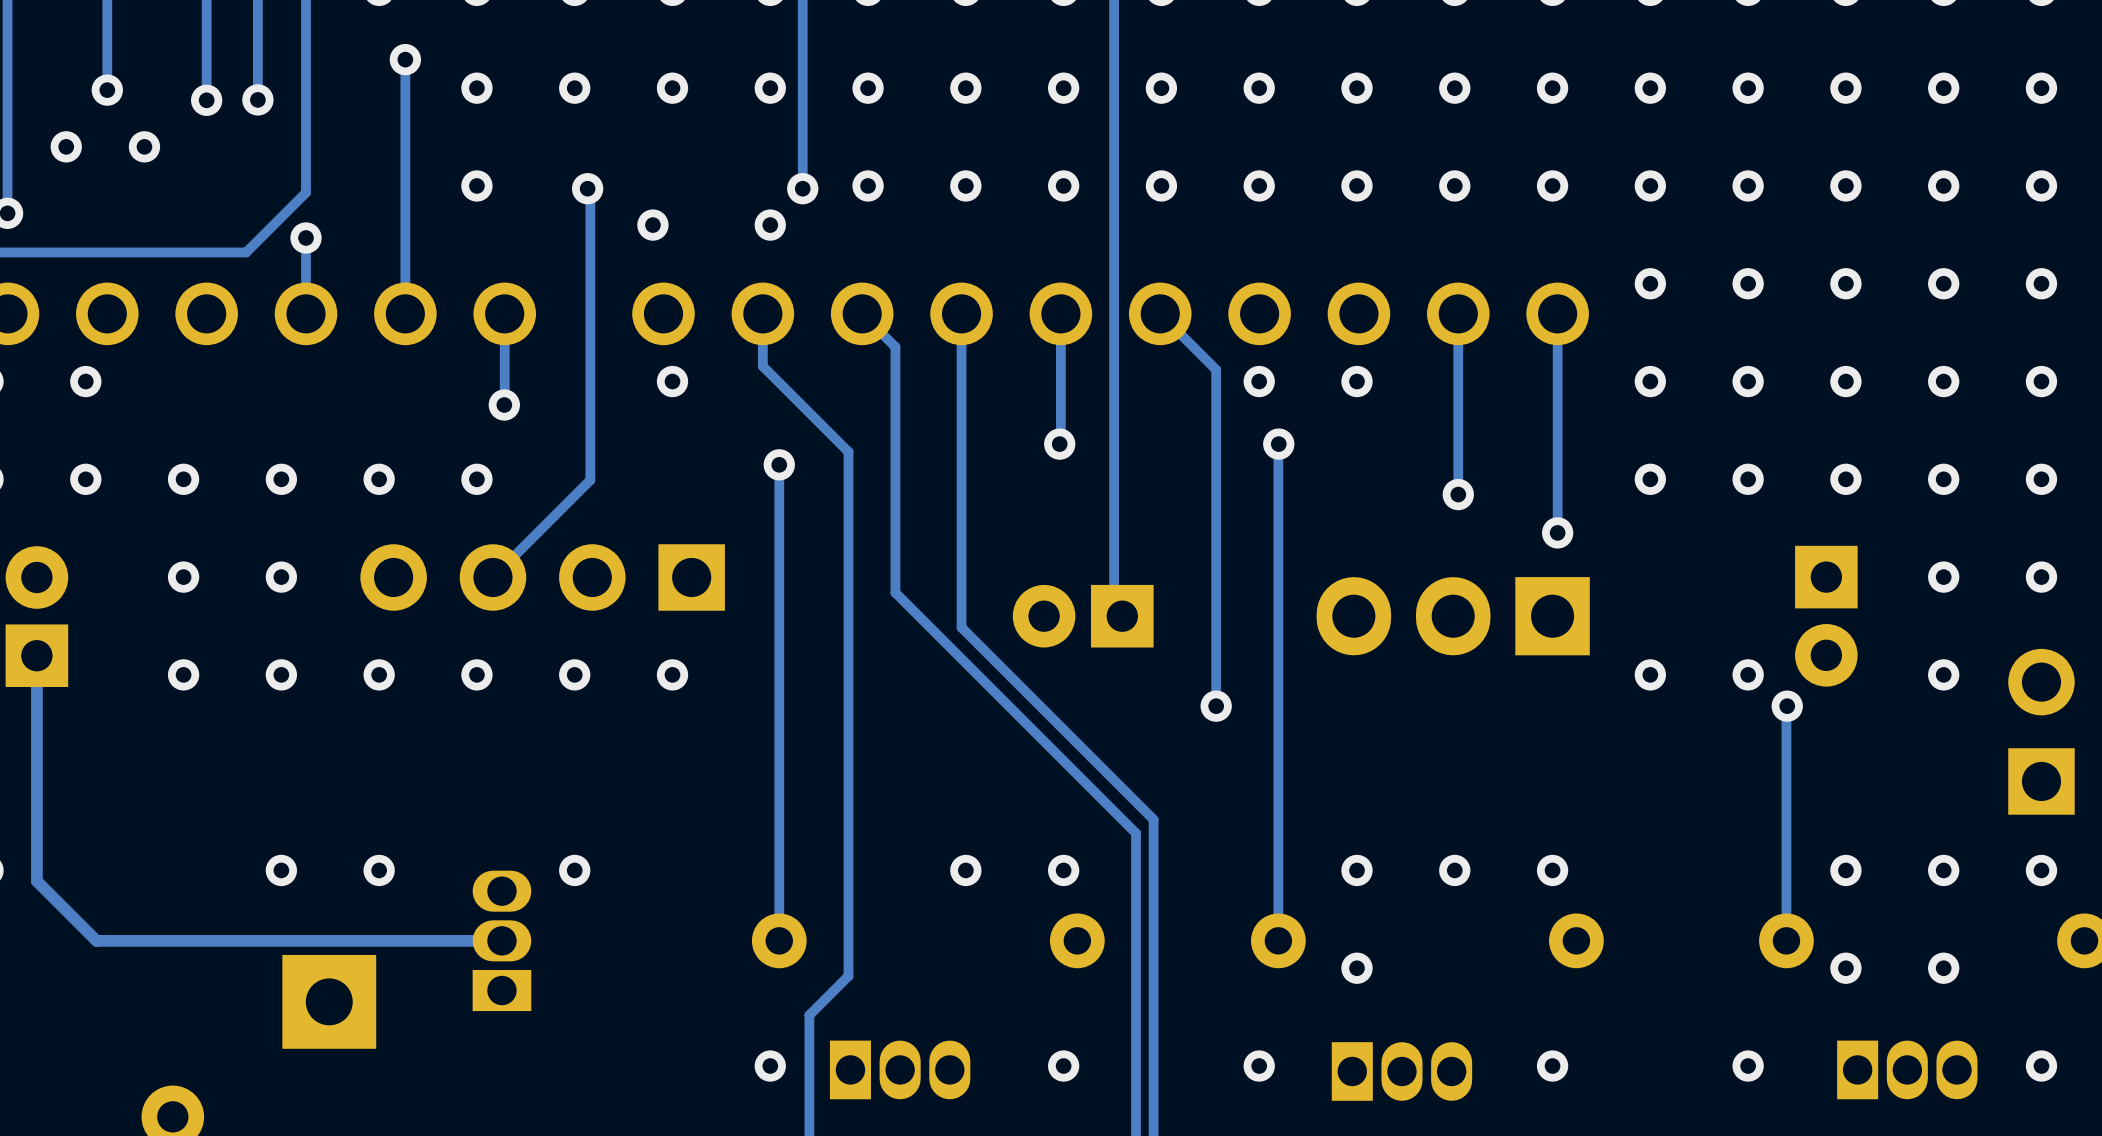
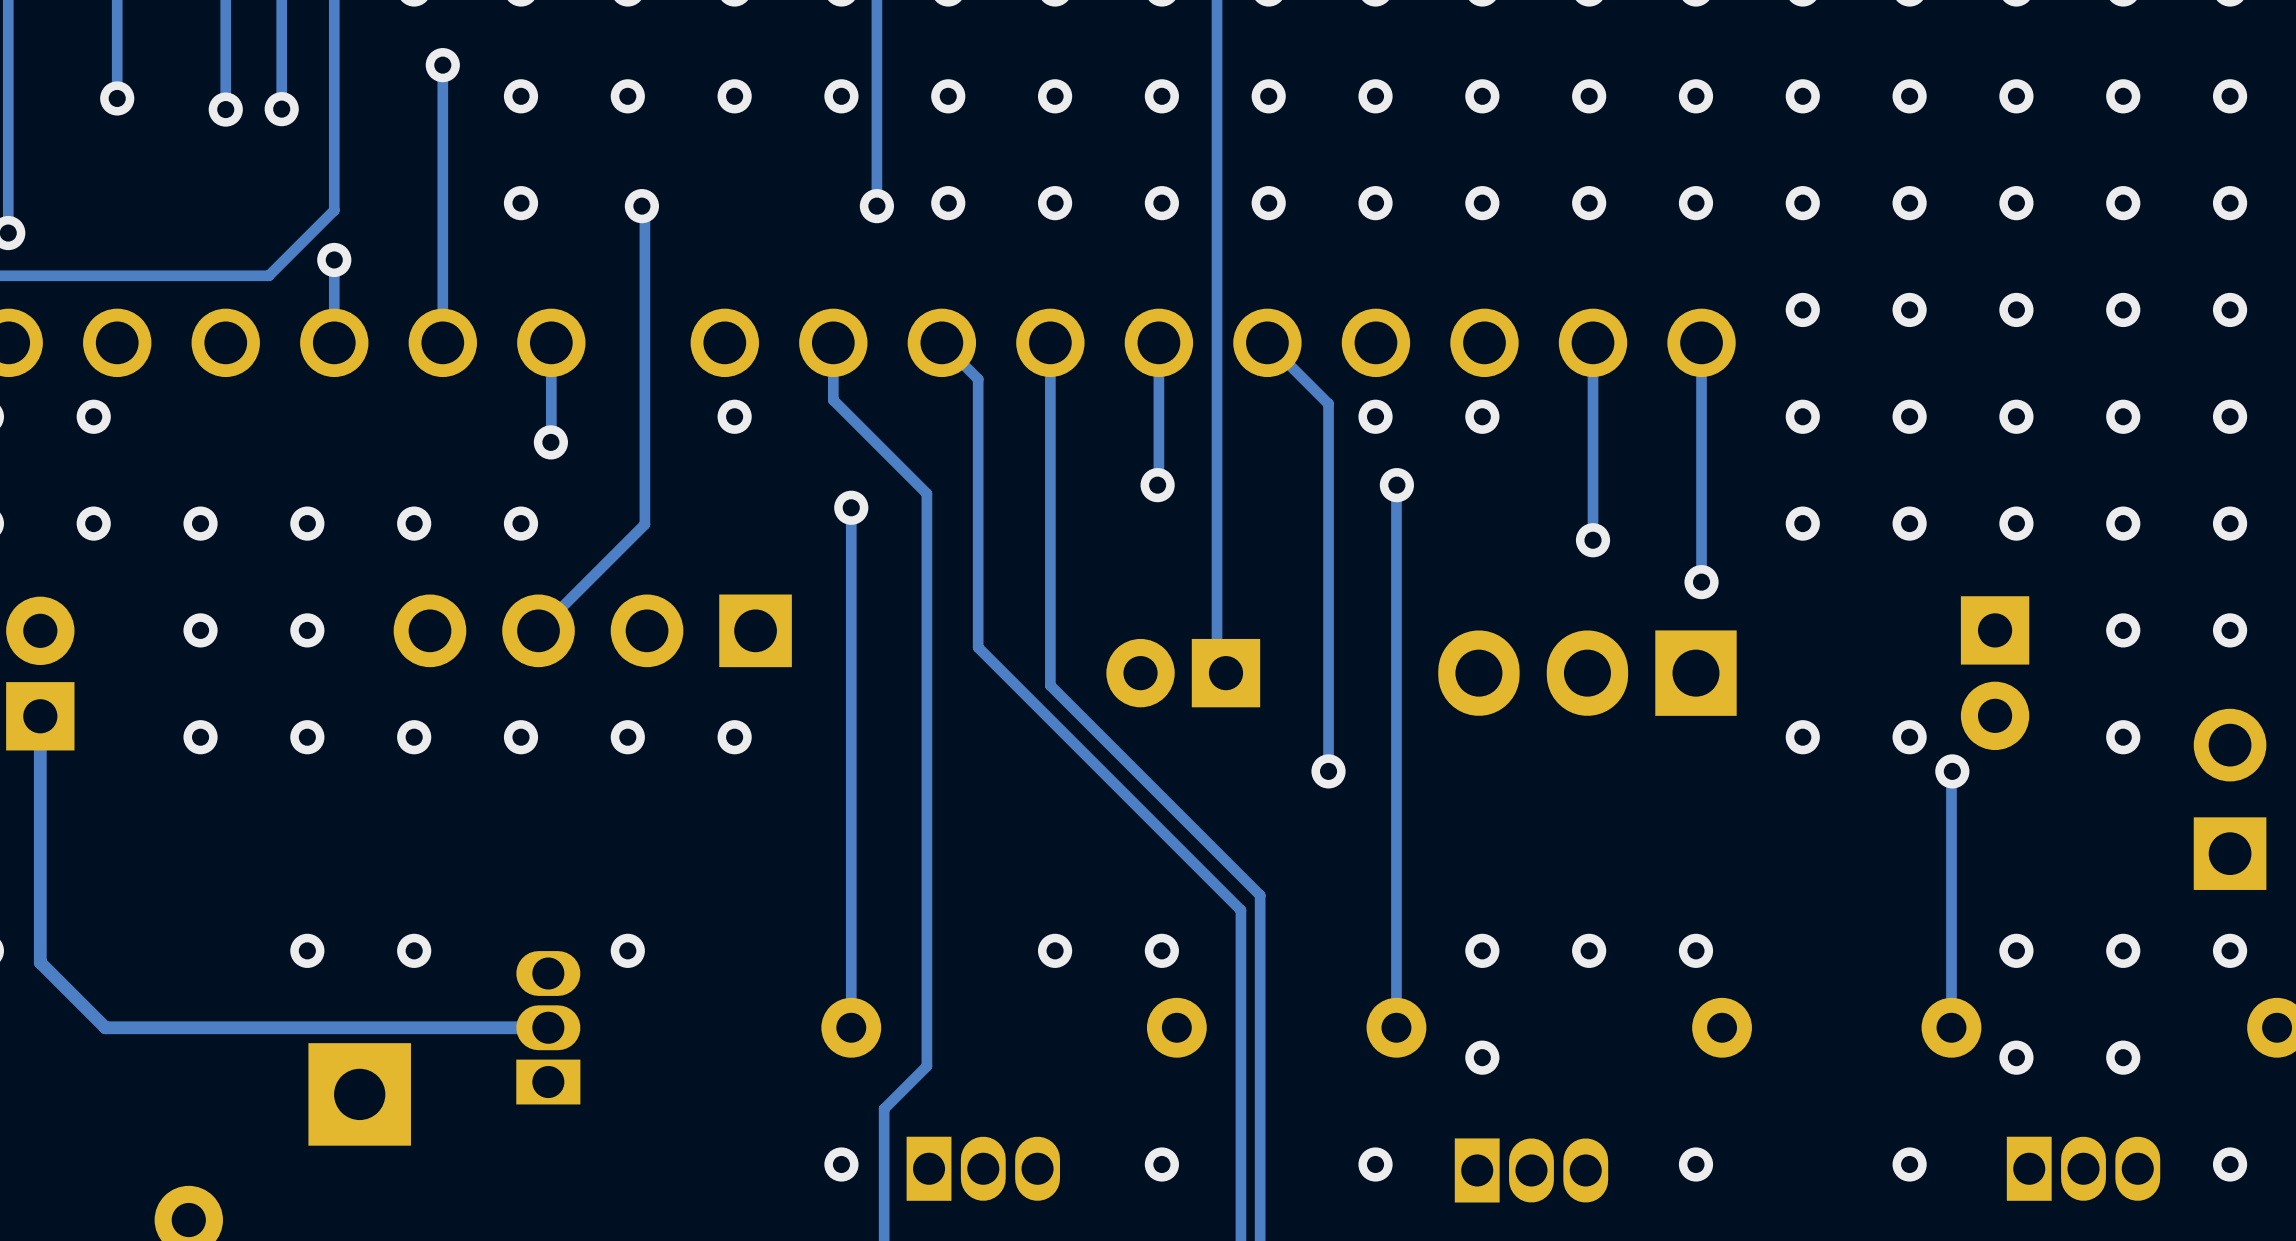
via: (66, 146) -> none
via: (144, 146) -> none
via: (652, 225) -> none
via: (770, 225) -> none

